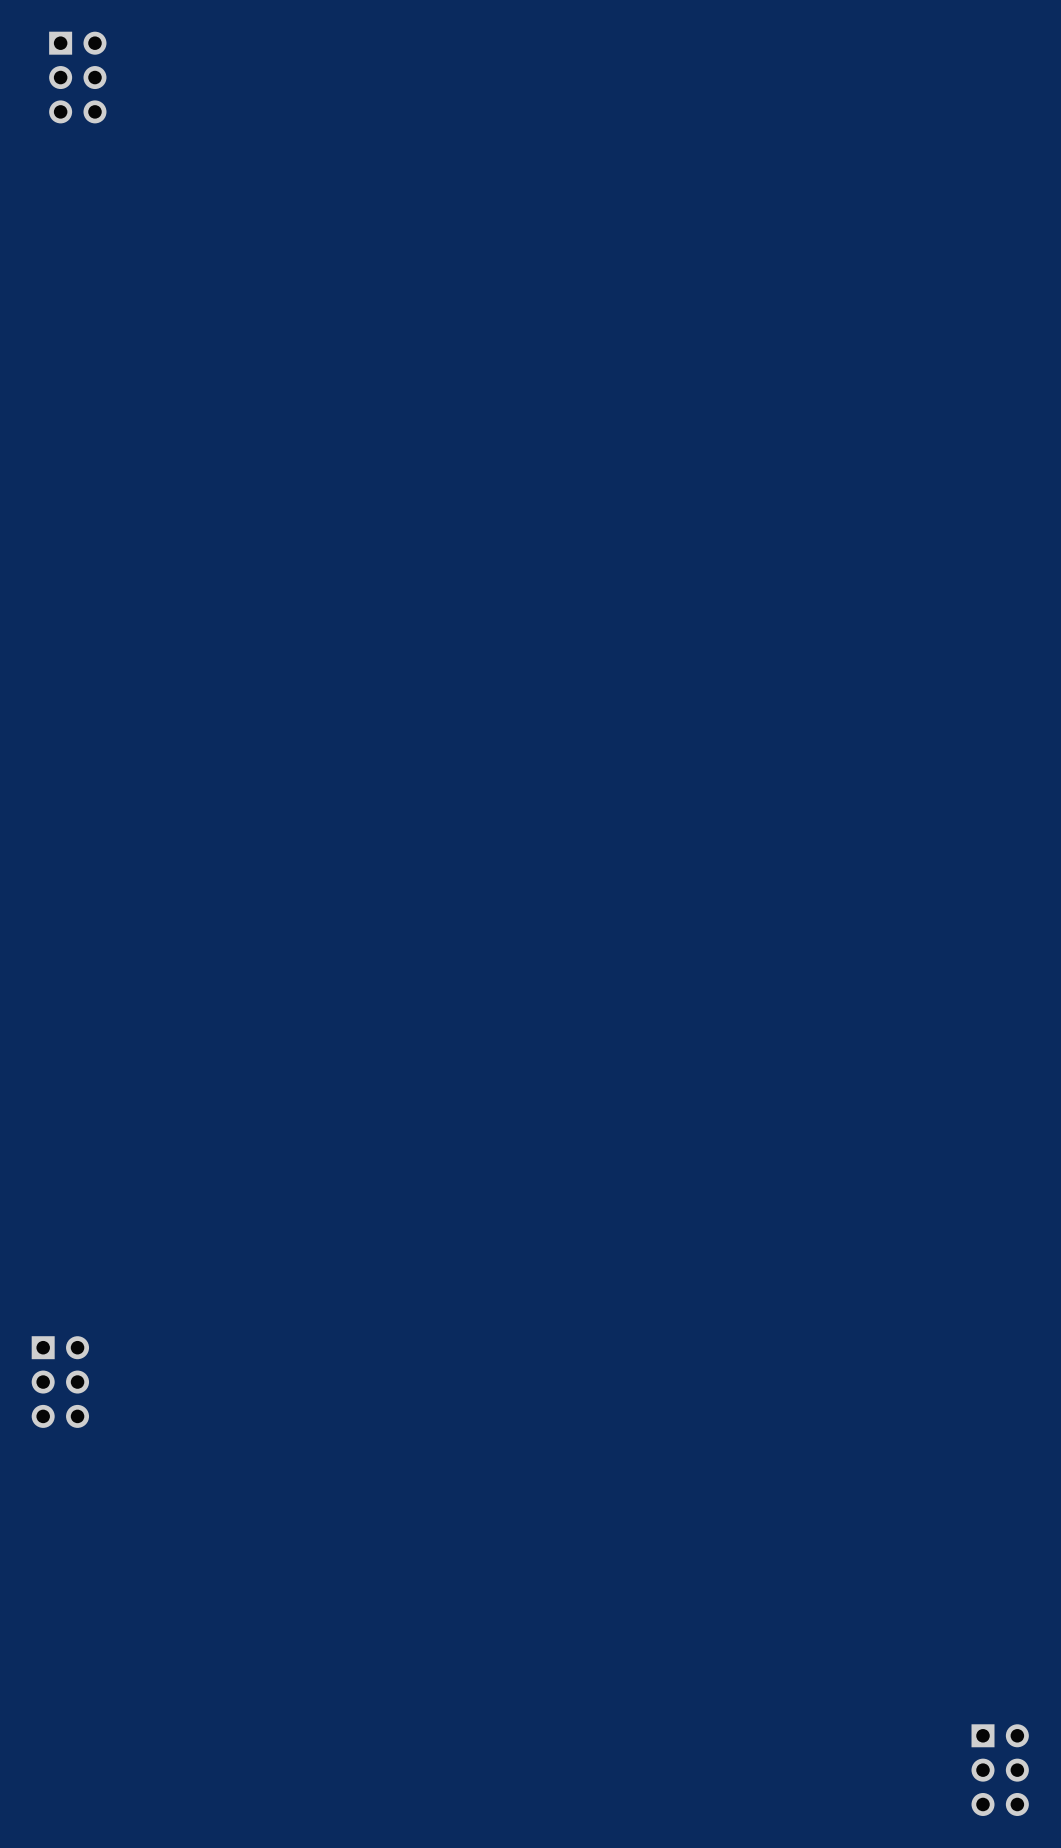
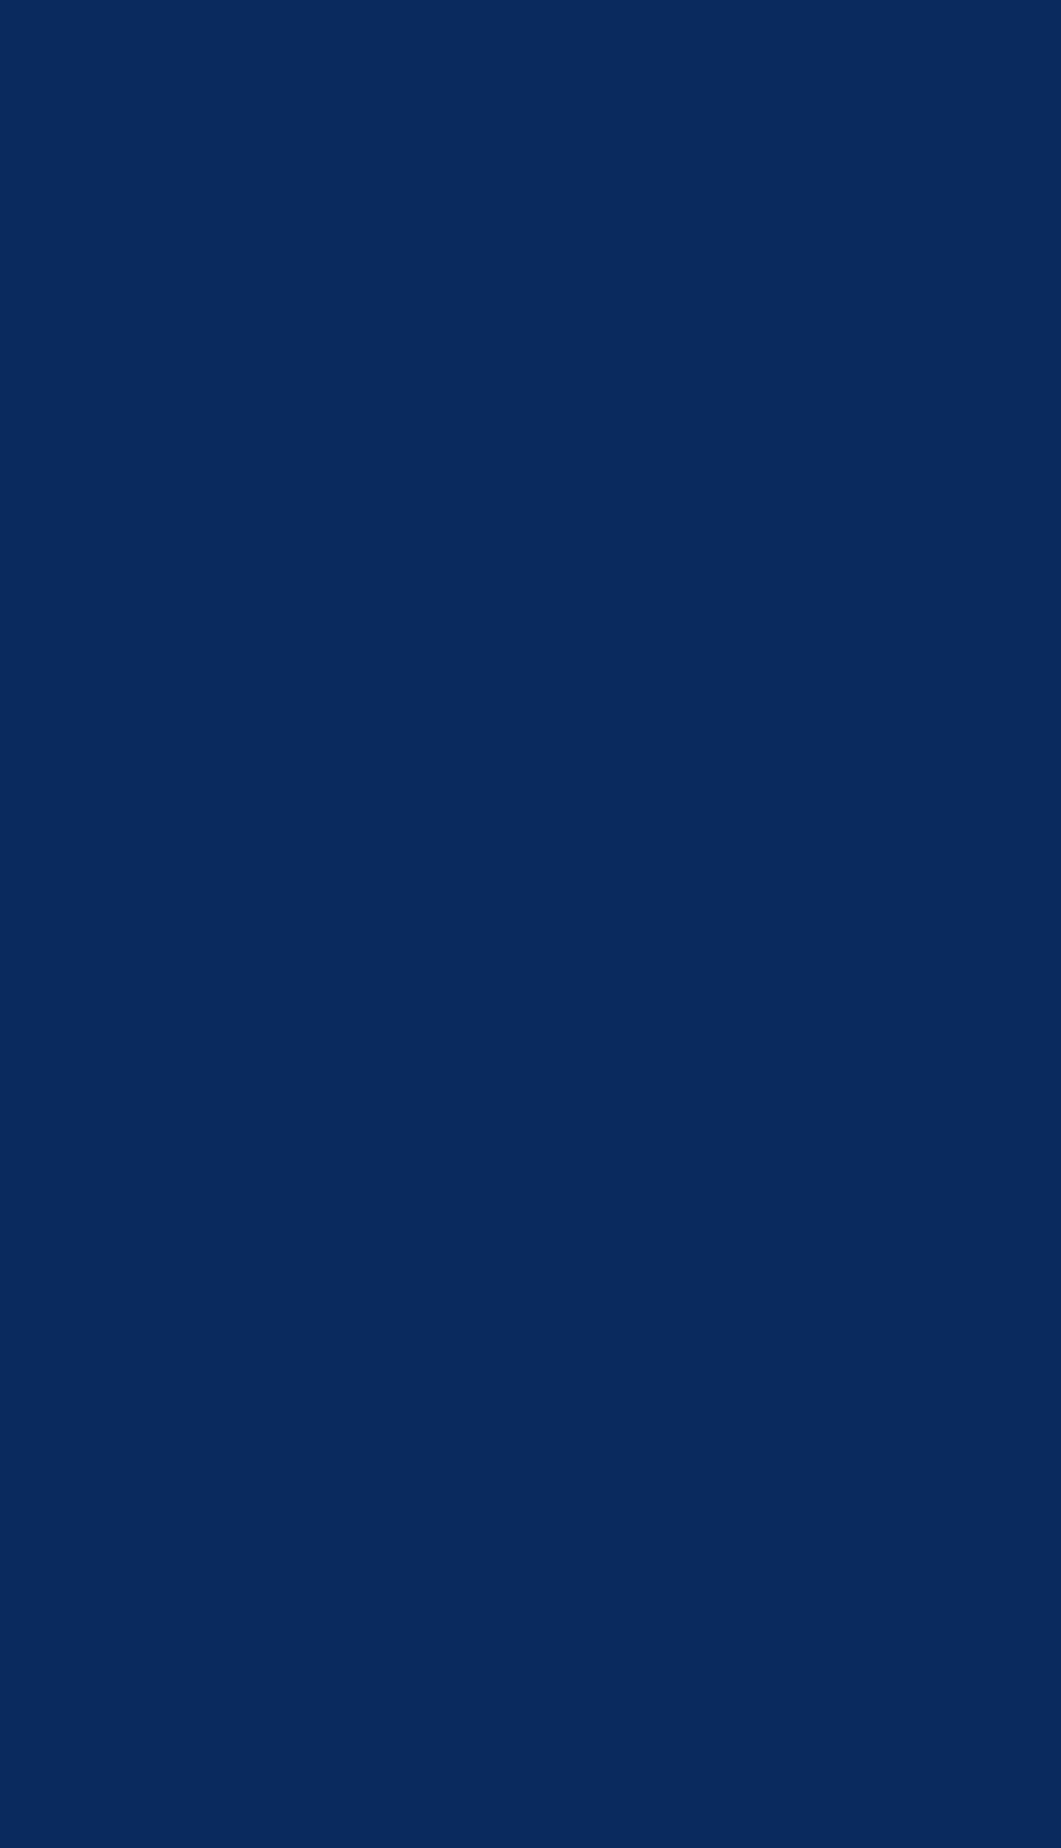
part: (77, 77) -> none
part: (60, 1382) -> none
part: (1000, 1770) -> none

